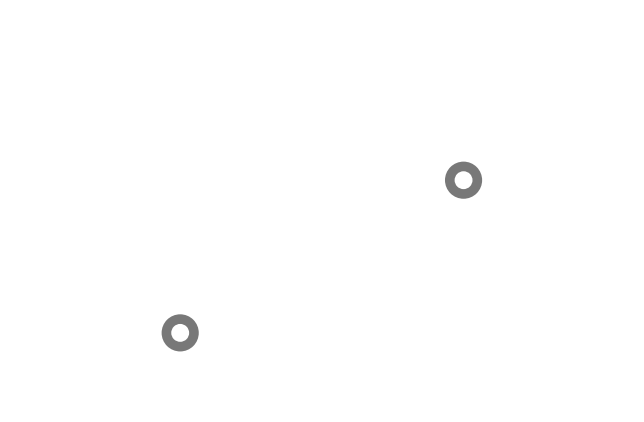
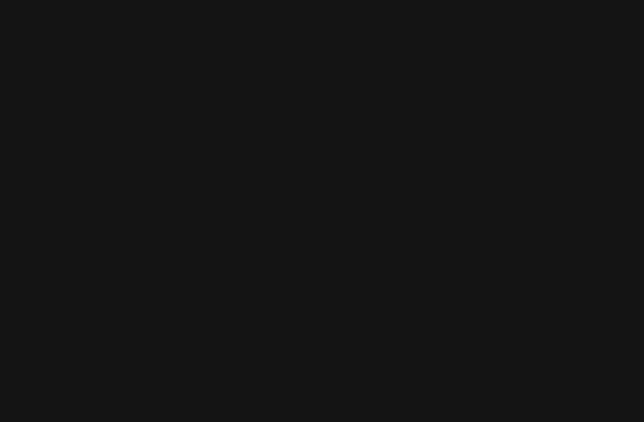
via: (463, 180) -> none
via: (180, 332) -> none

